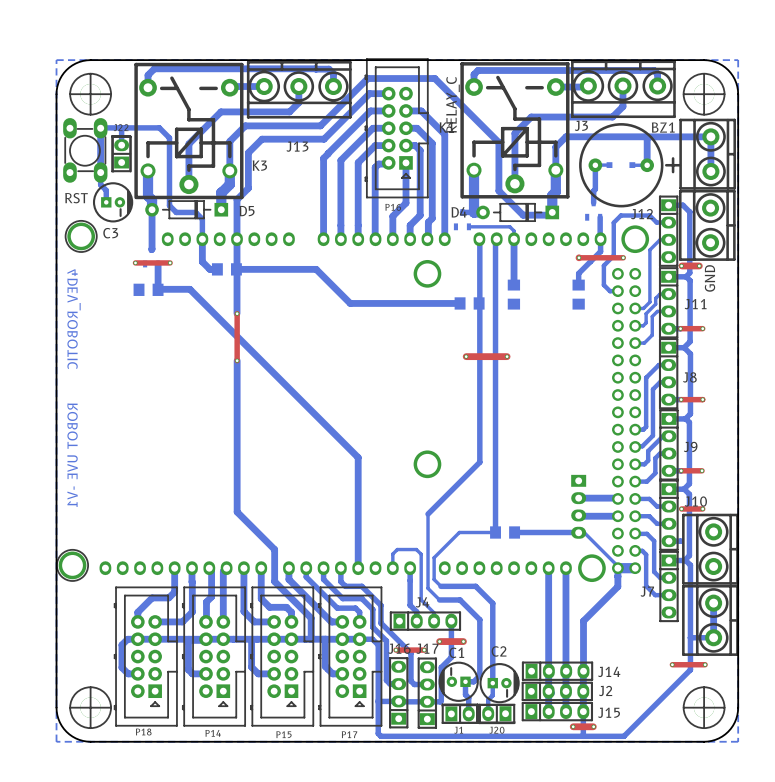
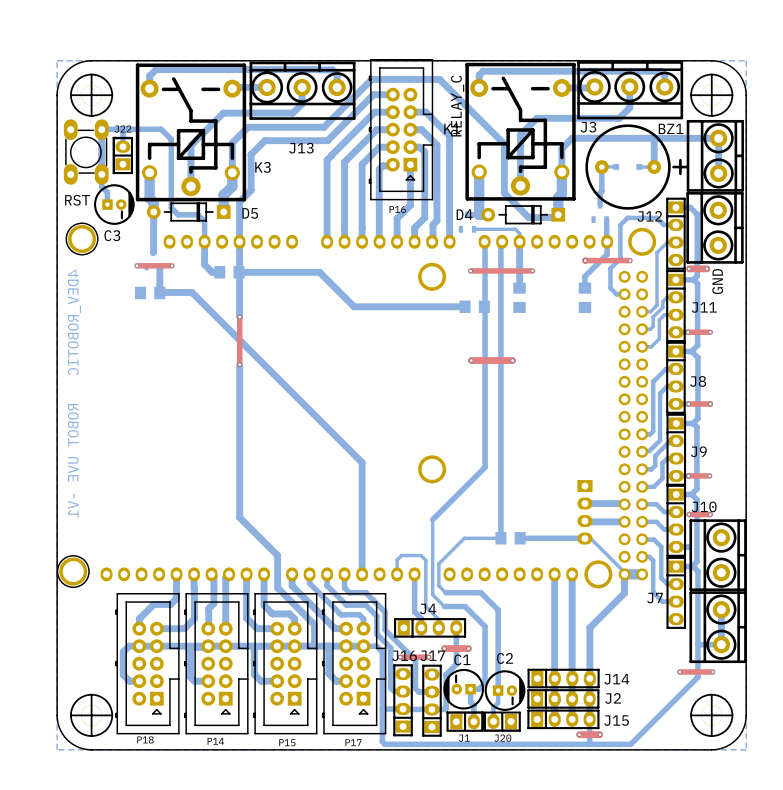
top track: none -> (470, 270) (532, 270)
via: none -> (470, 270)
via: none -> (532, 270)

